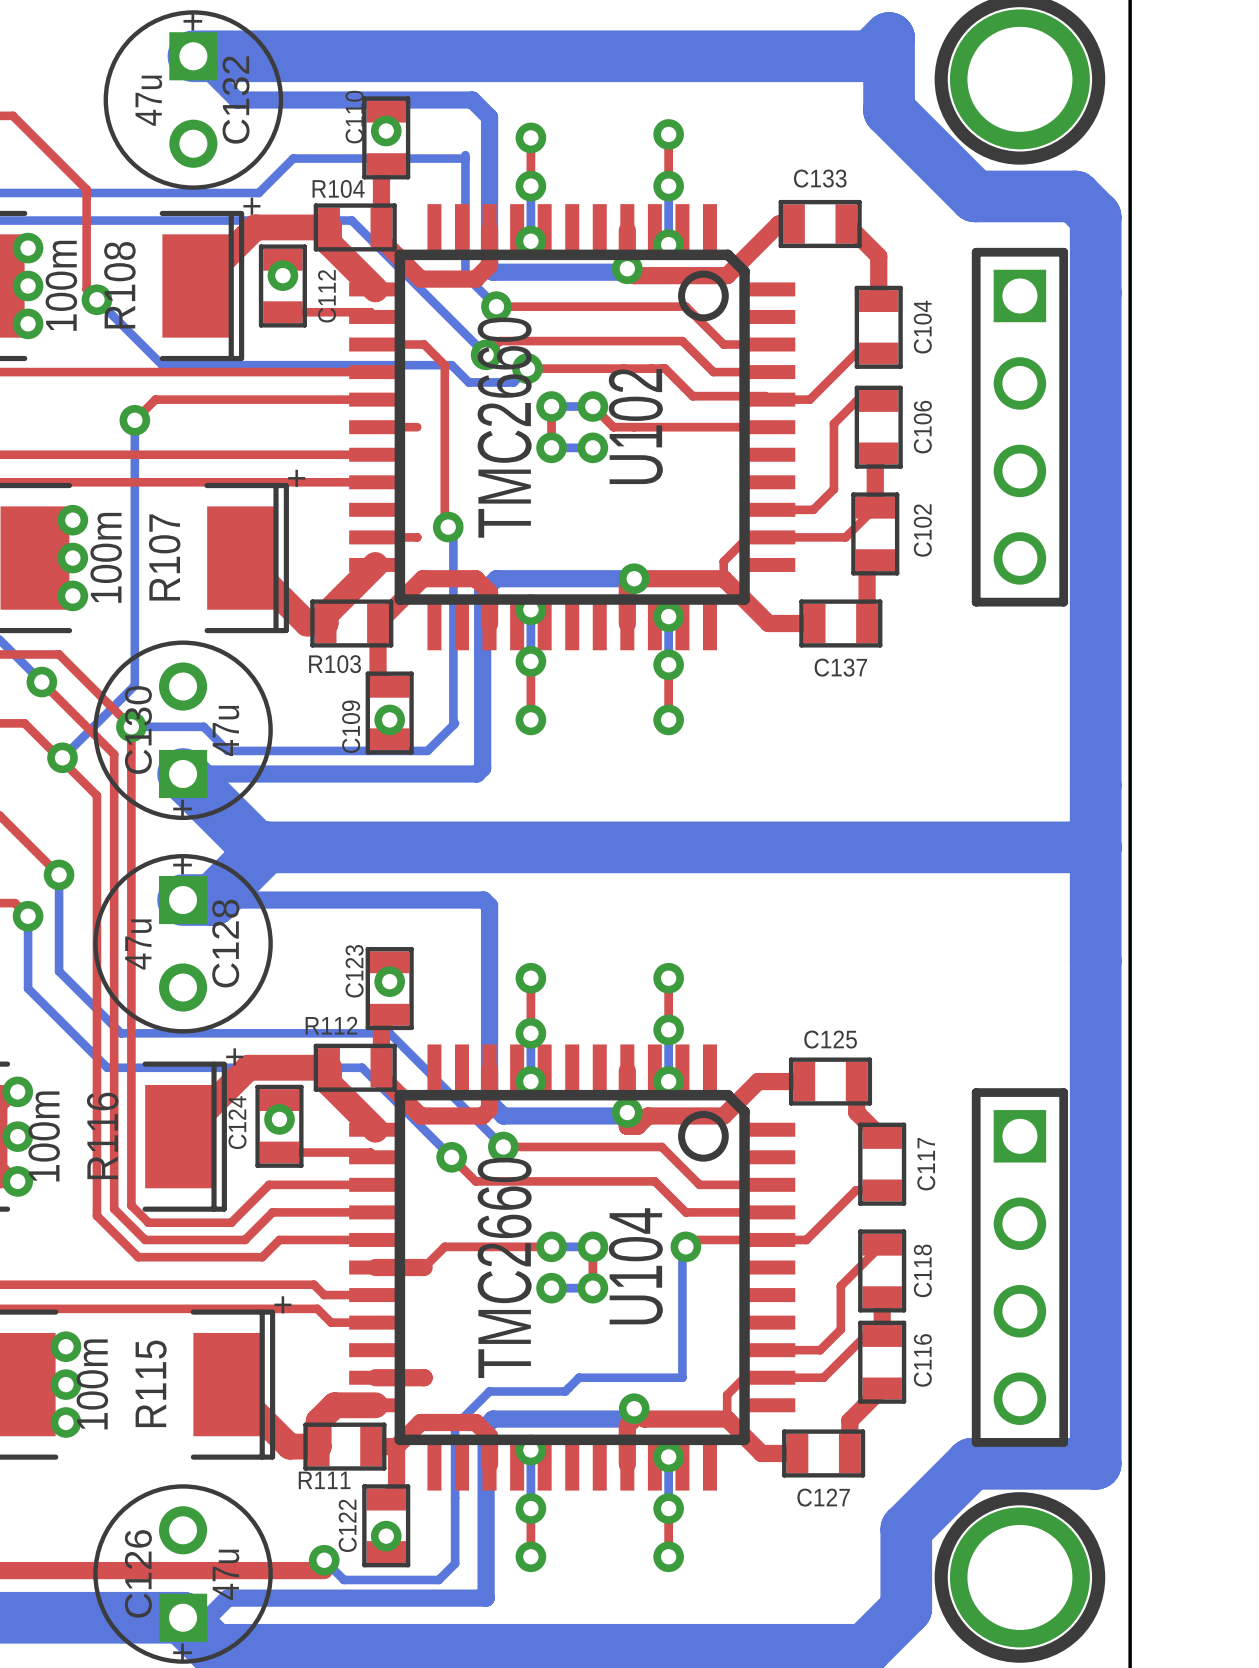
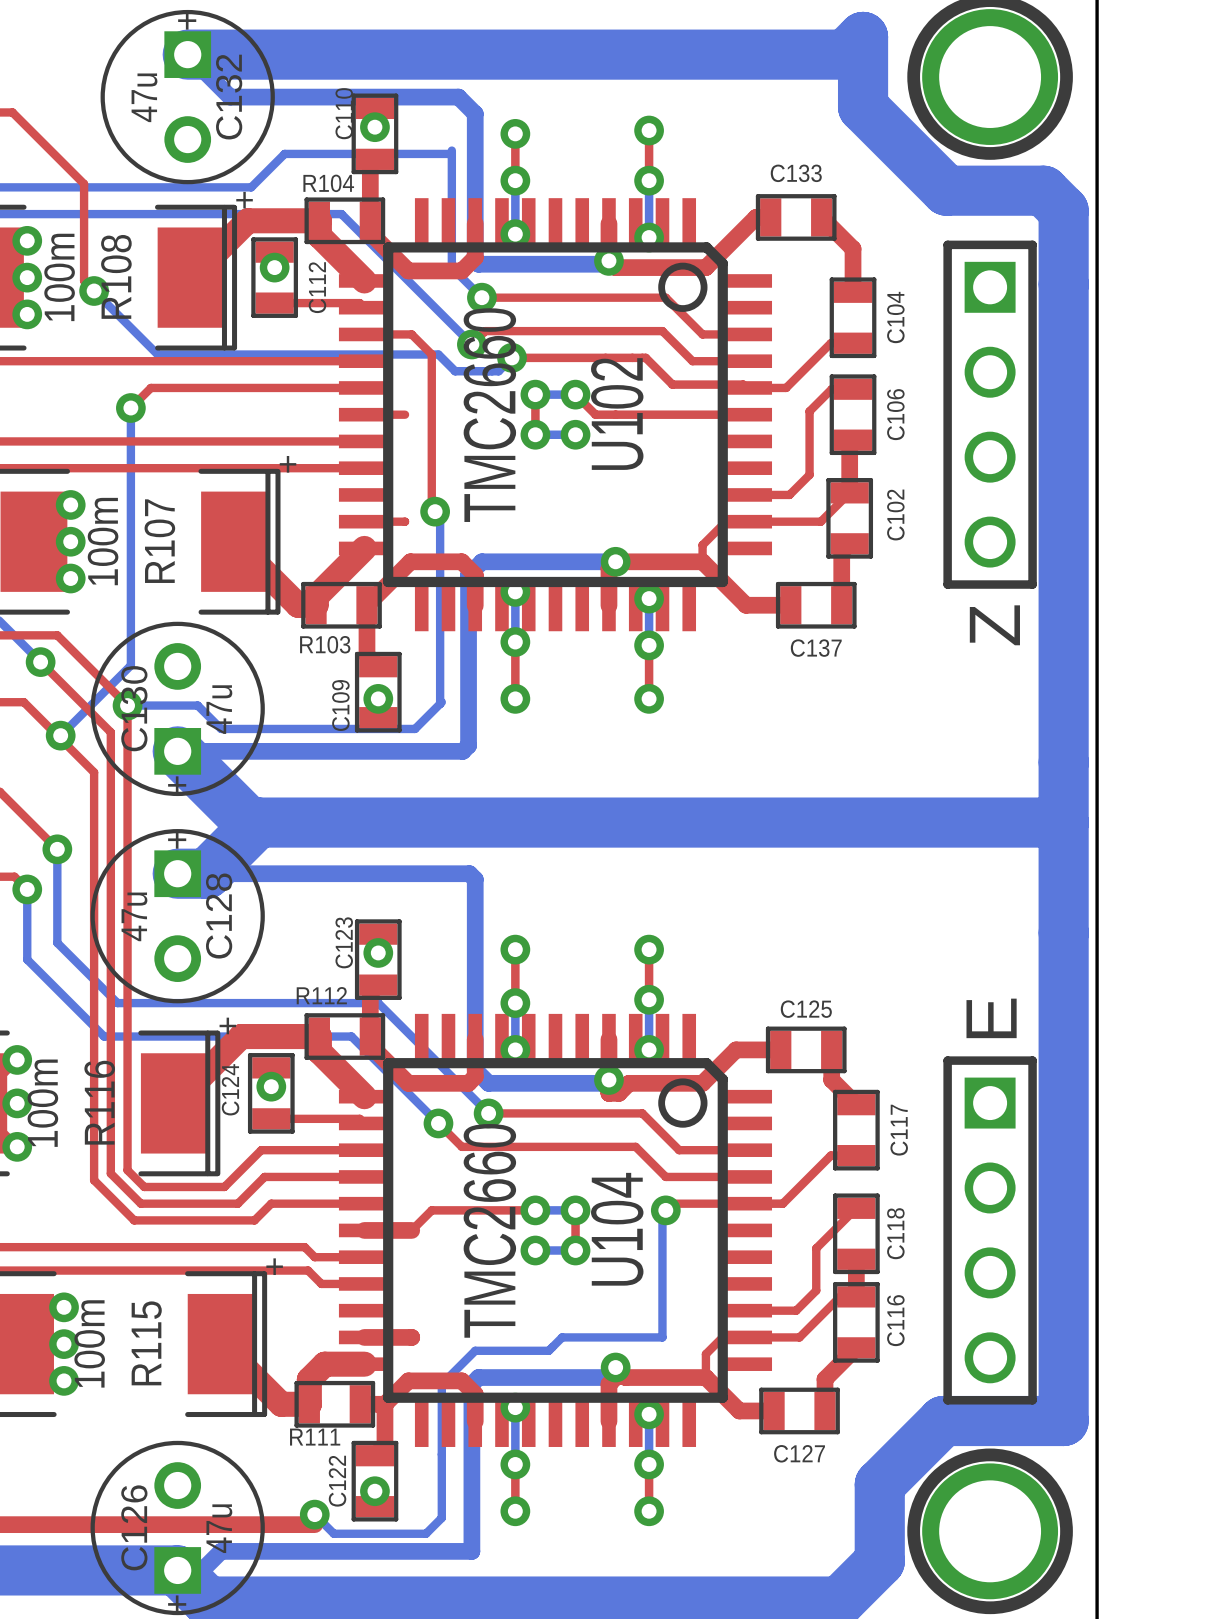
text: none -> Z (994, 625)
text: none -> E (991, 1018)

